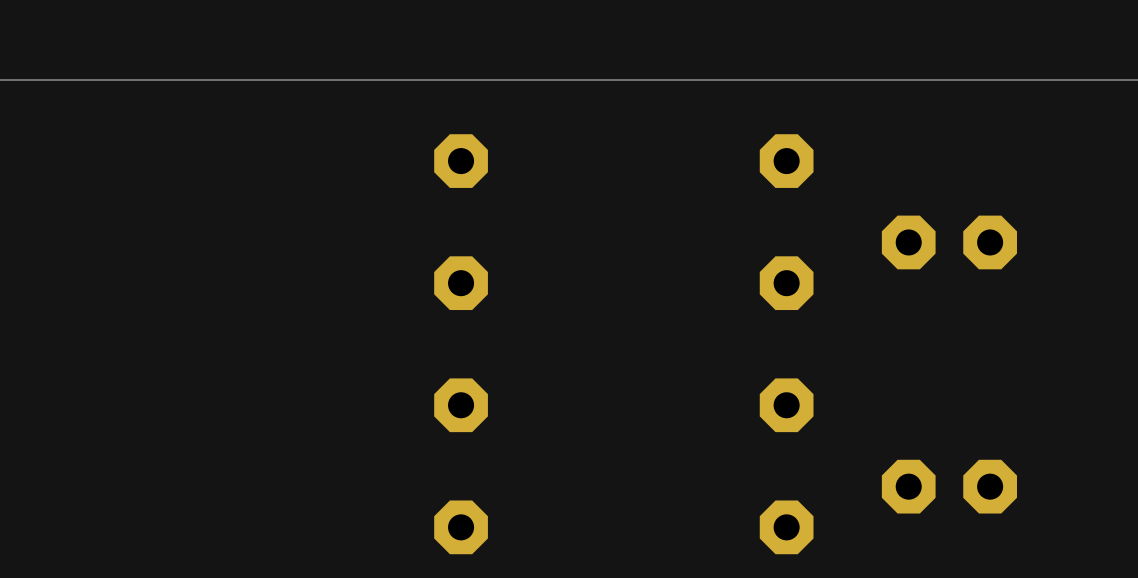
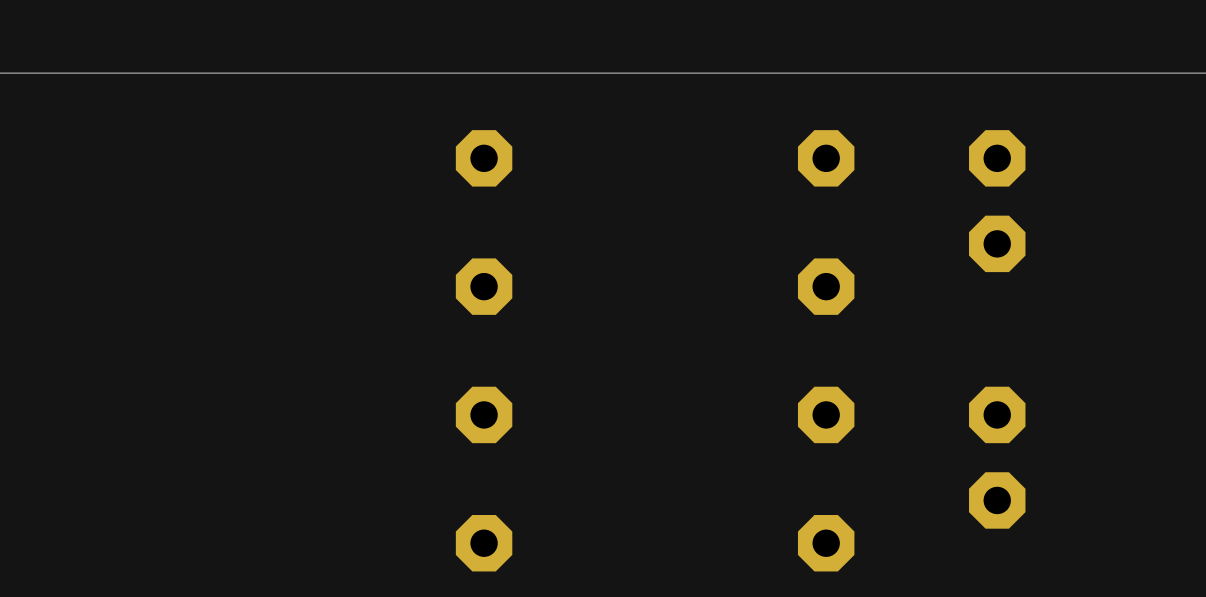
part rotation: 0° (949, 242) -> 90° clockwise (997, 201)
part rotation: 0° (949, 486) -> 90° clockwise (997, 457)

